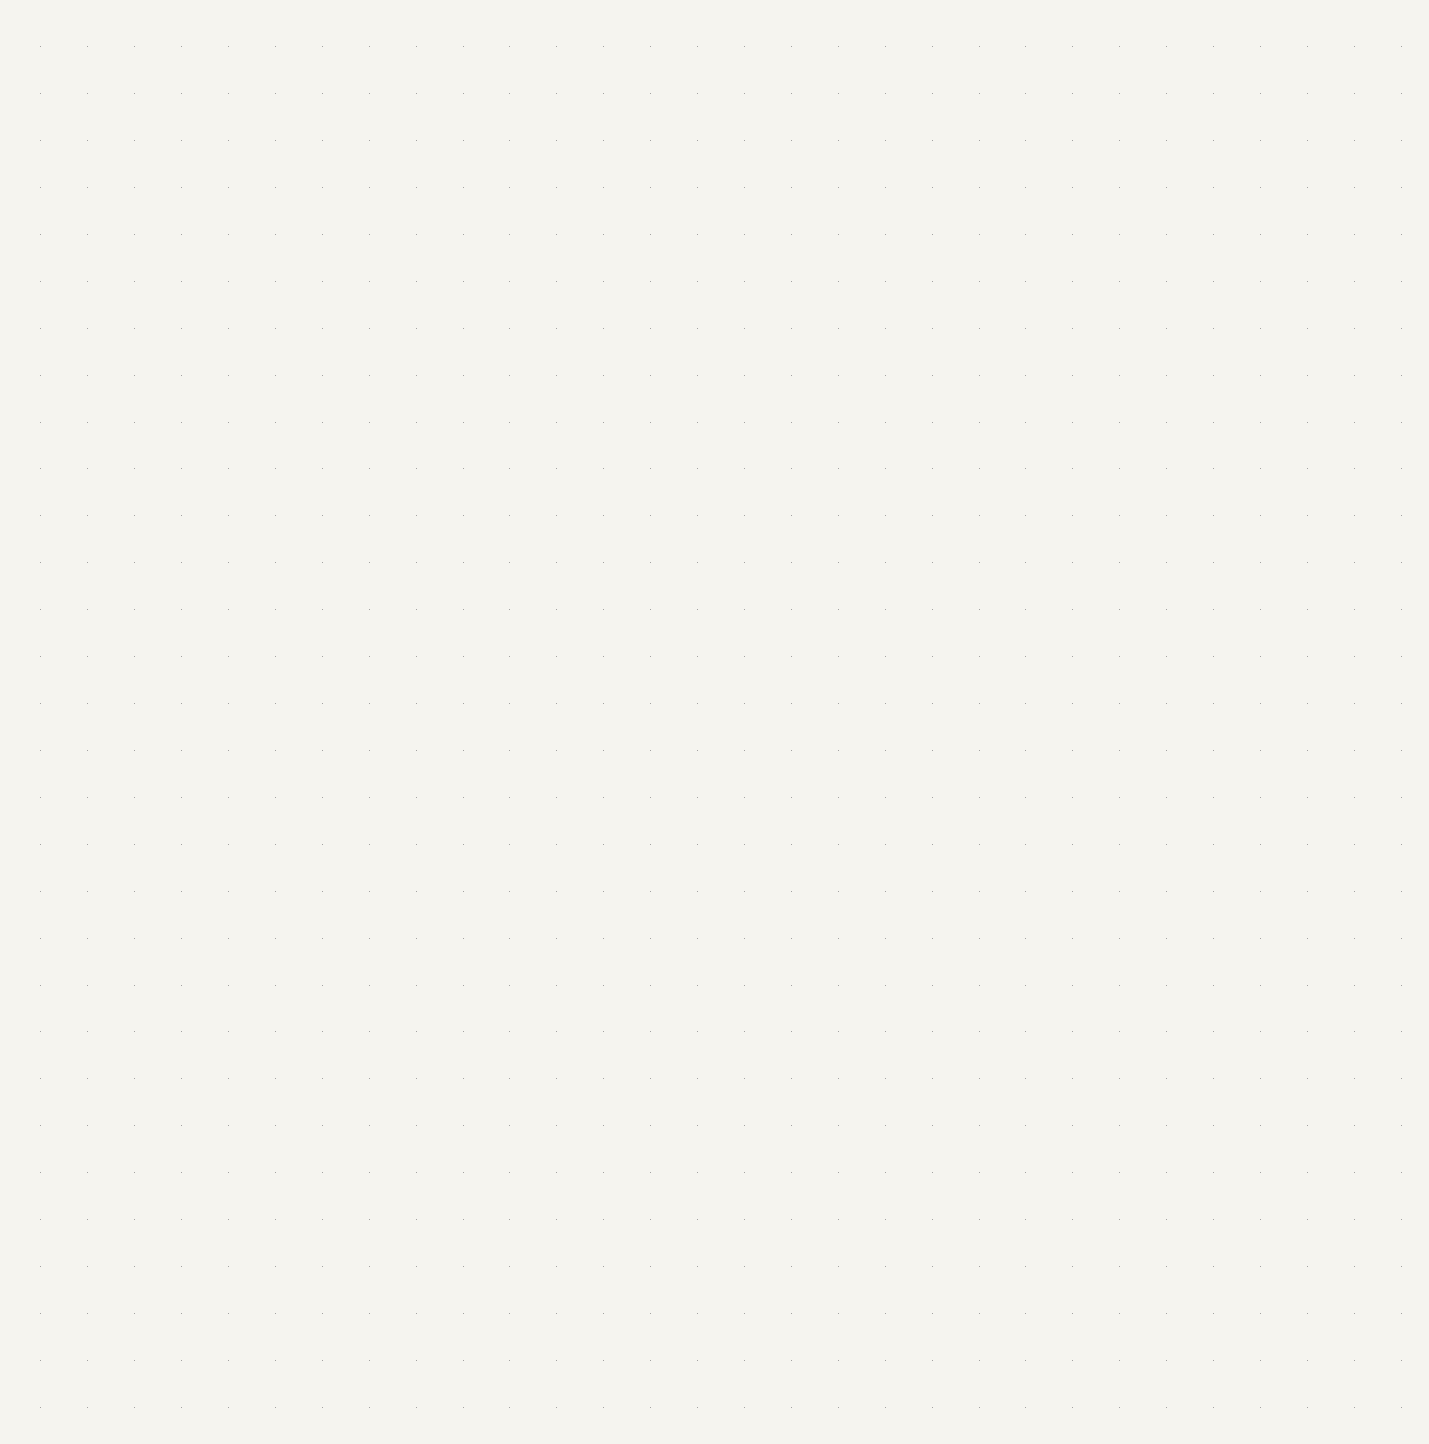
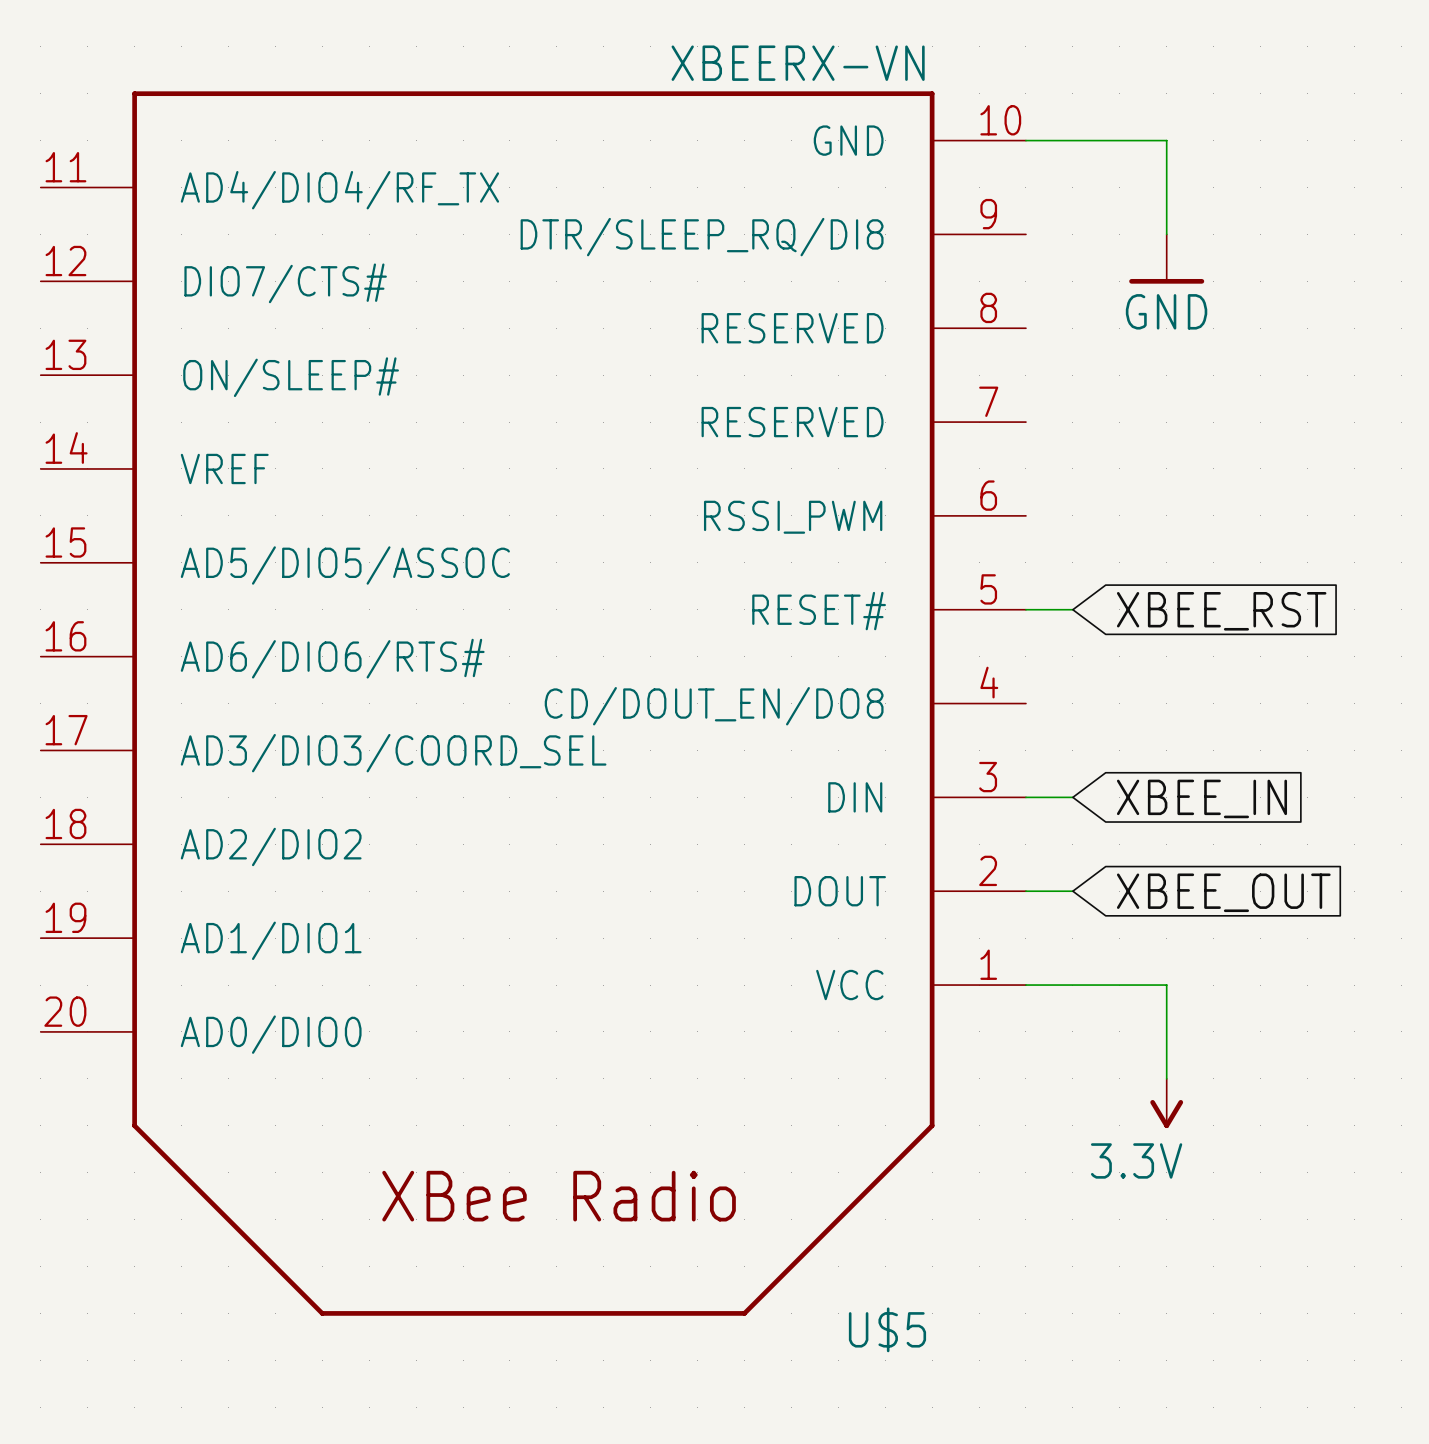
wire: none -> (1025, 140) (1166, 140) (1166, 234)
power symbol: none -> GND (1166, 259)
wire: none -> (1025, 609) (1072, 609)
global label: none -> XBEE_RST (1221, 611)
U$5: none -> XBEERX-VN (533, 703)
wire: none -> (1025, 797) (1072, 797)
global label: none -> XBEE_IN (1201, 798)
wire: none -> (1025, 891) (1072, 891)
global label: none -> XBEE_OUT (1223, 892)
wire: none -> (1025, 985) (1166, 985) (1166, 1078)
power symbol: none -> 3.3V (1166, 1103)

